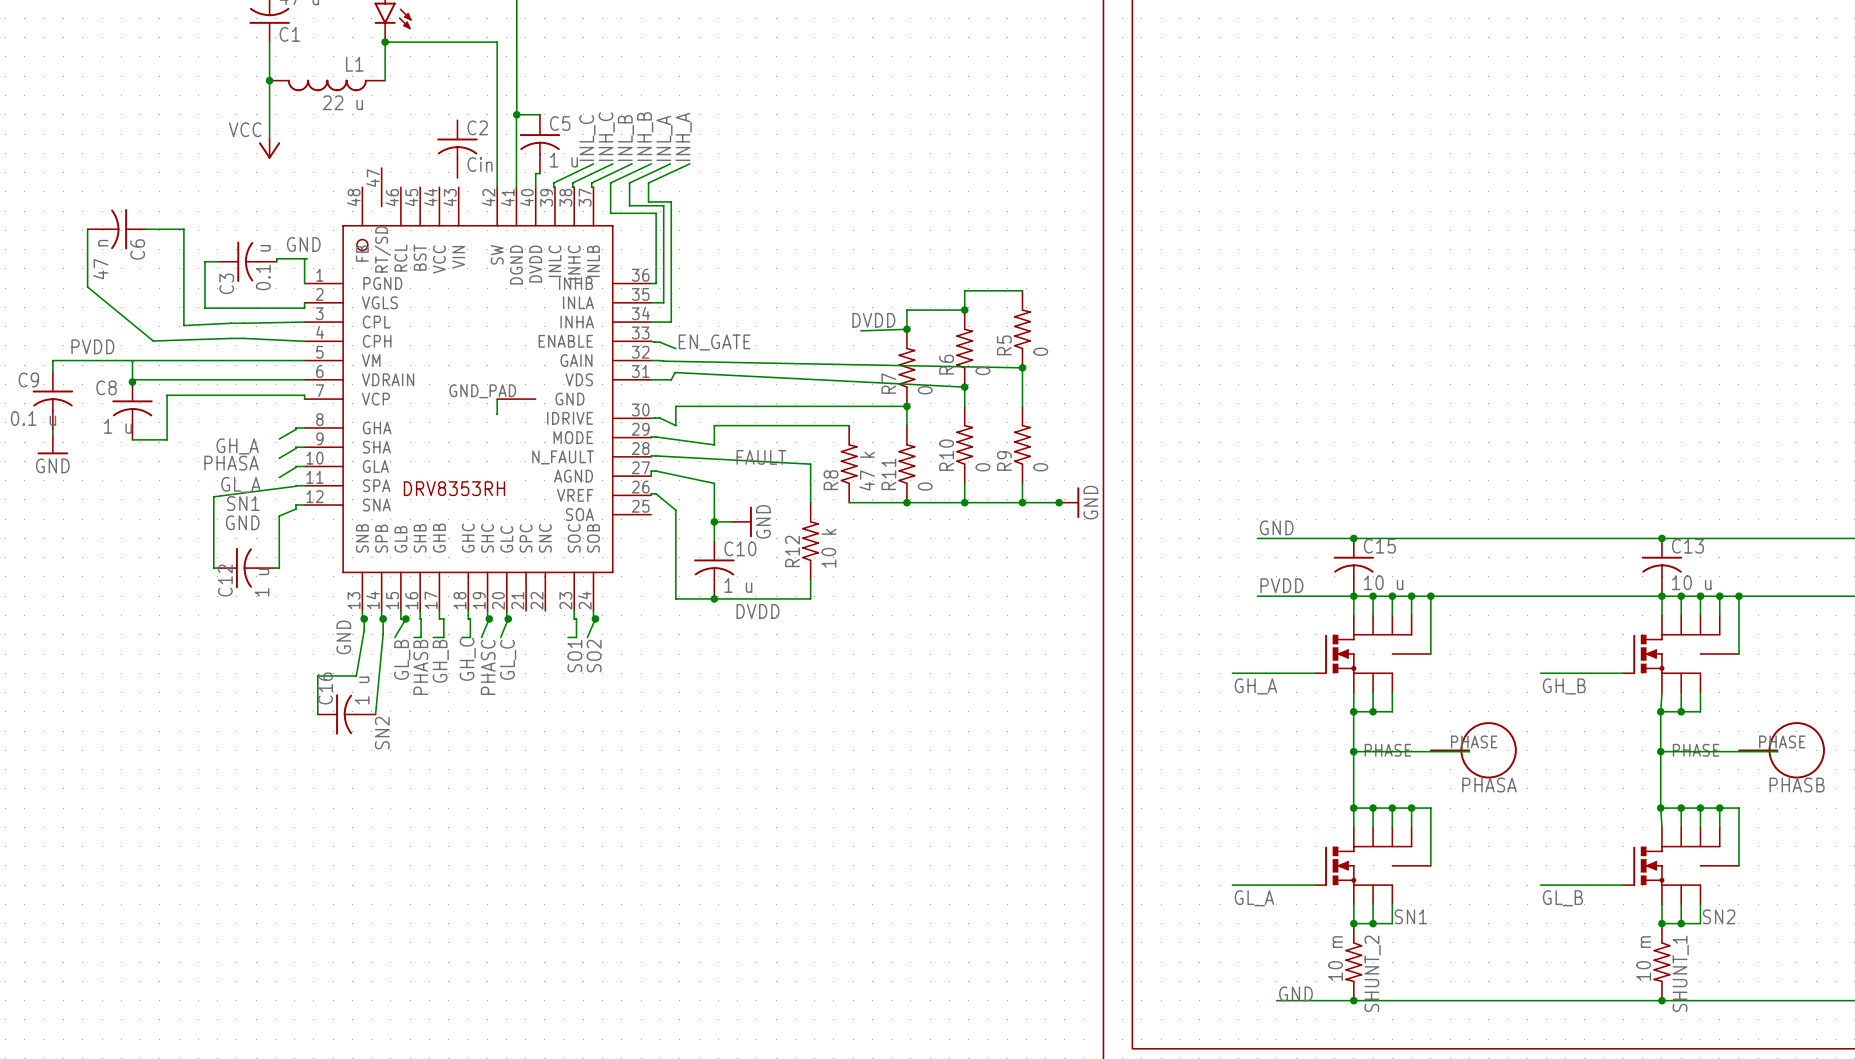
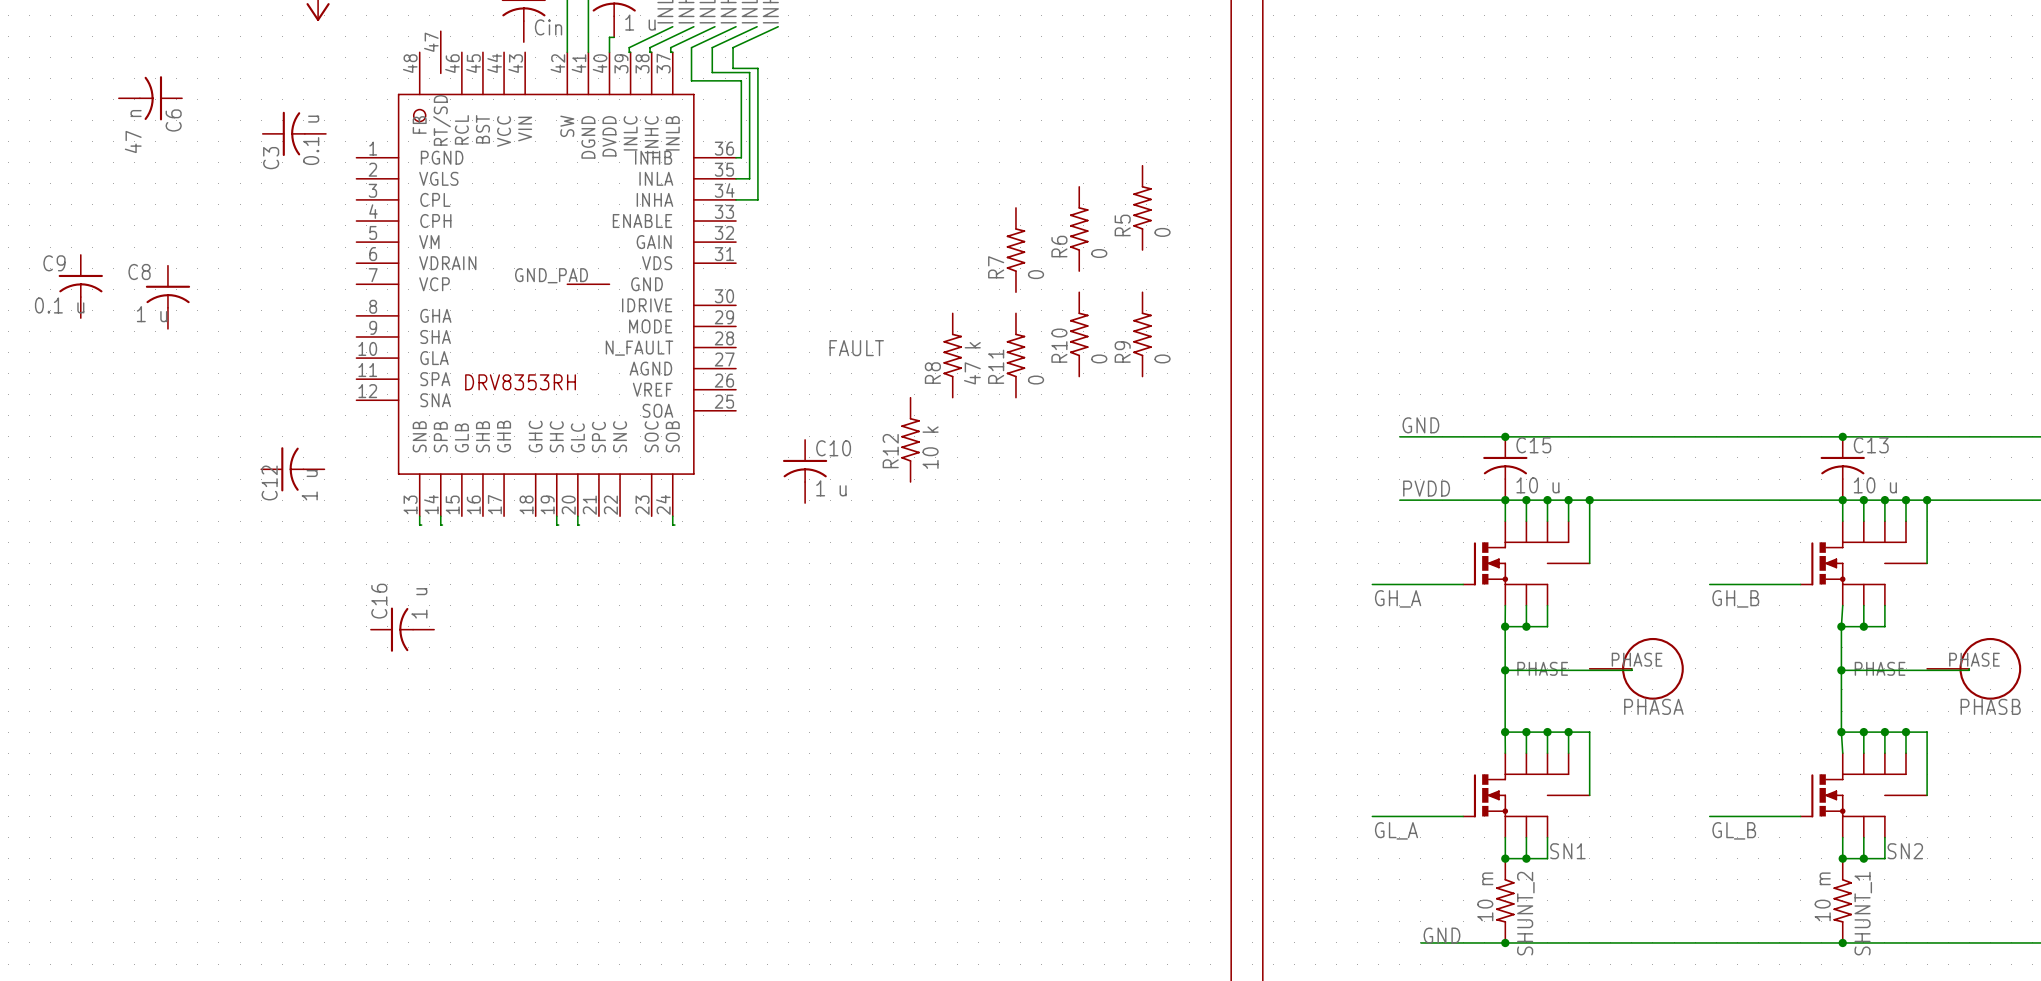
wire: (87, 229) (87, 287) (153, 341) (243, 338) (304, 341) -> none
wire: (145, 229) (183, 229) (183, 325) (304, 322) -> none
label: GND (303, 244) -> none
wire: (304, 258) (304, 283) -> none
wire: (307, 258) (276, 258) (276, 261) -> none
wire: (219, 261) (204, 261) (204, 308) (304, 308) (304, 302) -> none
wire: (1022, 290) (964, 290) (964, 310) (906, 310) (906, 329) (860, 330) -> none
junction: (964, 310) -> none
label: DVDD (873, 320) -> none
junction: (906, 329) -> none
wire: (651, 341) (659, 342) (675, 348) -> none
label: EN_GATE (714, 342) -> none
label: PVDD (92, 346) -> none
wire: (304, 360) (52, 360) (52, 372) -> none
wire: (651, 360) (1022, 367) (1022, 406) -> none
wire: (132, 361) (132, 382) -> none
junction: (1022, 367) -> none
wire: (132, 379) (304, 379) -> none
wire: (651, 379) (671, 379) (675, 372) (964, 387) (964, 406) -> none
junction: (132, 382) -> none
junction: (964, 387) -> none
wire: (304, 399) (304, 395) (167, 395) (167, 439) (132, 439) -> none
wire: (497, 399) (496, 414) -> none
junction: (906, 406) -> none
wire: (651, 418) (659, 418) (675, 425) (675, 406) (906, 406) (906, 425) -> none
wire: (849, 425) (714, 425) (714, 444) (651, 437) -> none
wire: (304, 427) (295, 427) (279, 439) -> none
wire: (52, 430) (52, 434) -> none
power symbol: GND (52, 444) -> none
label: GH_A (237, 446) -> none
wire: (304, 447) (295, 447) (279, 458) -> none
wire: (651, 456) (810, 464) (810, 502) -> none
label: PHASA (231, 463) -> none
wire: (304, 466) (295, 466) (279, 477) -> none
wire: (651, 476) (651, 471) (656, 471) (714, 483) (714, 541) -> none
wire: (964, 483) (964, 502) -> none
wire: (1022, 483) (1022, 502) -> none
label: GL_A (241, 484) -> none
wire: (304, 485) (213, 496) (213, 568) (217, 568) -> none
wire: (651, 495) (656, 493) (675, 510) (675, 598) (810, 598) (810, 579) -> none
wire: (849, 502) (1059, 502) -> none
junction: (906, 502) -> none
junction: (964, 502) -> none
junction: (1022, 502) -> none
junction: (1059, 502) -> none
power symbol: GND (1069, 502) -> none
label: SN1 (243, 503) -> none
wire: (304, 505) (295, 505) (295, 509) (279, 516) (279, 568) (275, 568) -> none
wire: (714, 521) (731, 521) -> none
junction: (714, 521) -> none
power symbol: GND (741, 521) -> none
label: GND (242, 522) -> none
junction: (714, 598) -> none
wire: (400, 610) (400, 618) (405, 618) -> none
wire: (420, 610) (421, 637) (414, 637) -> none
wire: (439, 610) (439, 618) (443, 618) (443, 637) (433, 637) -> none
wire: (468, 610) (470, 637) (462, 637) -> none
wire: (574, 610) (574, 618) (576, 618) (576, 637) (568, 637) -> none
label: DVDD (758, 611) -> none
wire: (364, 618) (364, 630) (356, 675) (317, 675) (317, 714) -> none
junction: (364, 618) -> none
wire: (383, 618) (375, 714) -> none
junction: (383, 618) -> none
wire: (405, 618) (394, 637) -> none
junction: (405, 618) -> none
wire: (489, 618) (481, 637) -> none
junction: (489, 618) -> none
wire: (508, 618) (500, 637) -> none
junction: (508, 618) -> none
wire: (595, 618) (587, 637) -> none
junction: (595, 618) -> none
label: GND (343, 637) -> none
label: SO1 (574, 656) -> none
label: SO2 (594, 656) -> none
label: GL_B (402, 659) -> none
label: GH_C (467, 659) -> none
label: GL_C (508, 659) -> none
label: GH_B (440, 661) -> none
label: PHASB (420, 667) -> none
label: PHASC (488, 667) -> none
label: SN2 (382, 733) -> none

